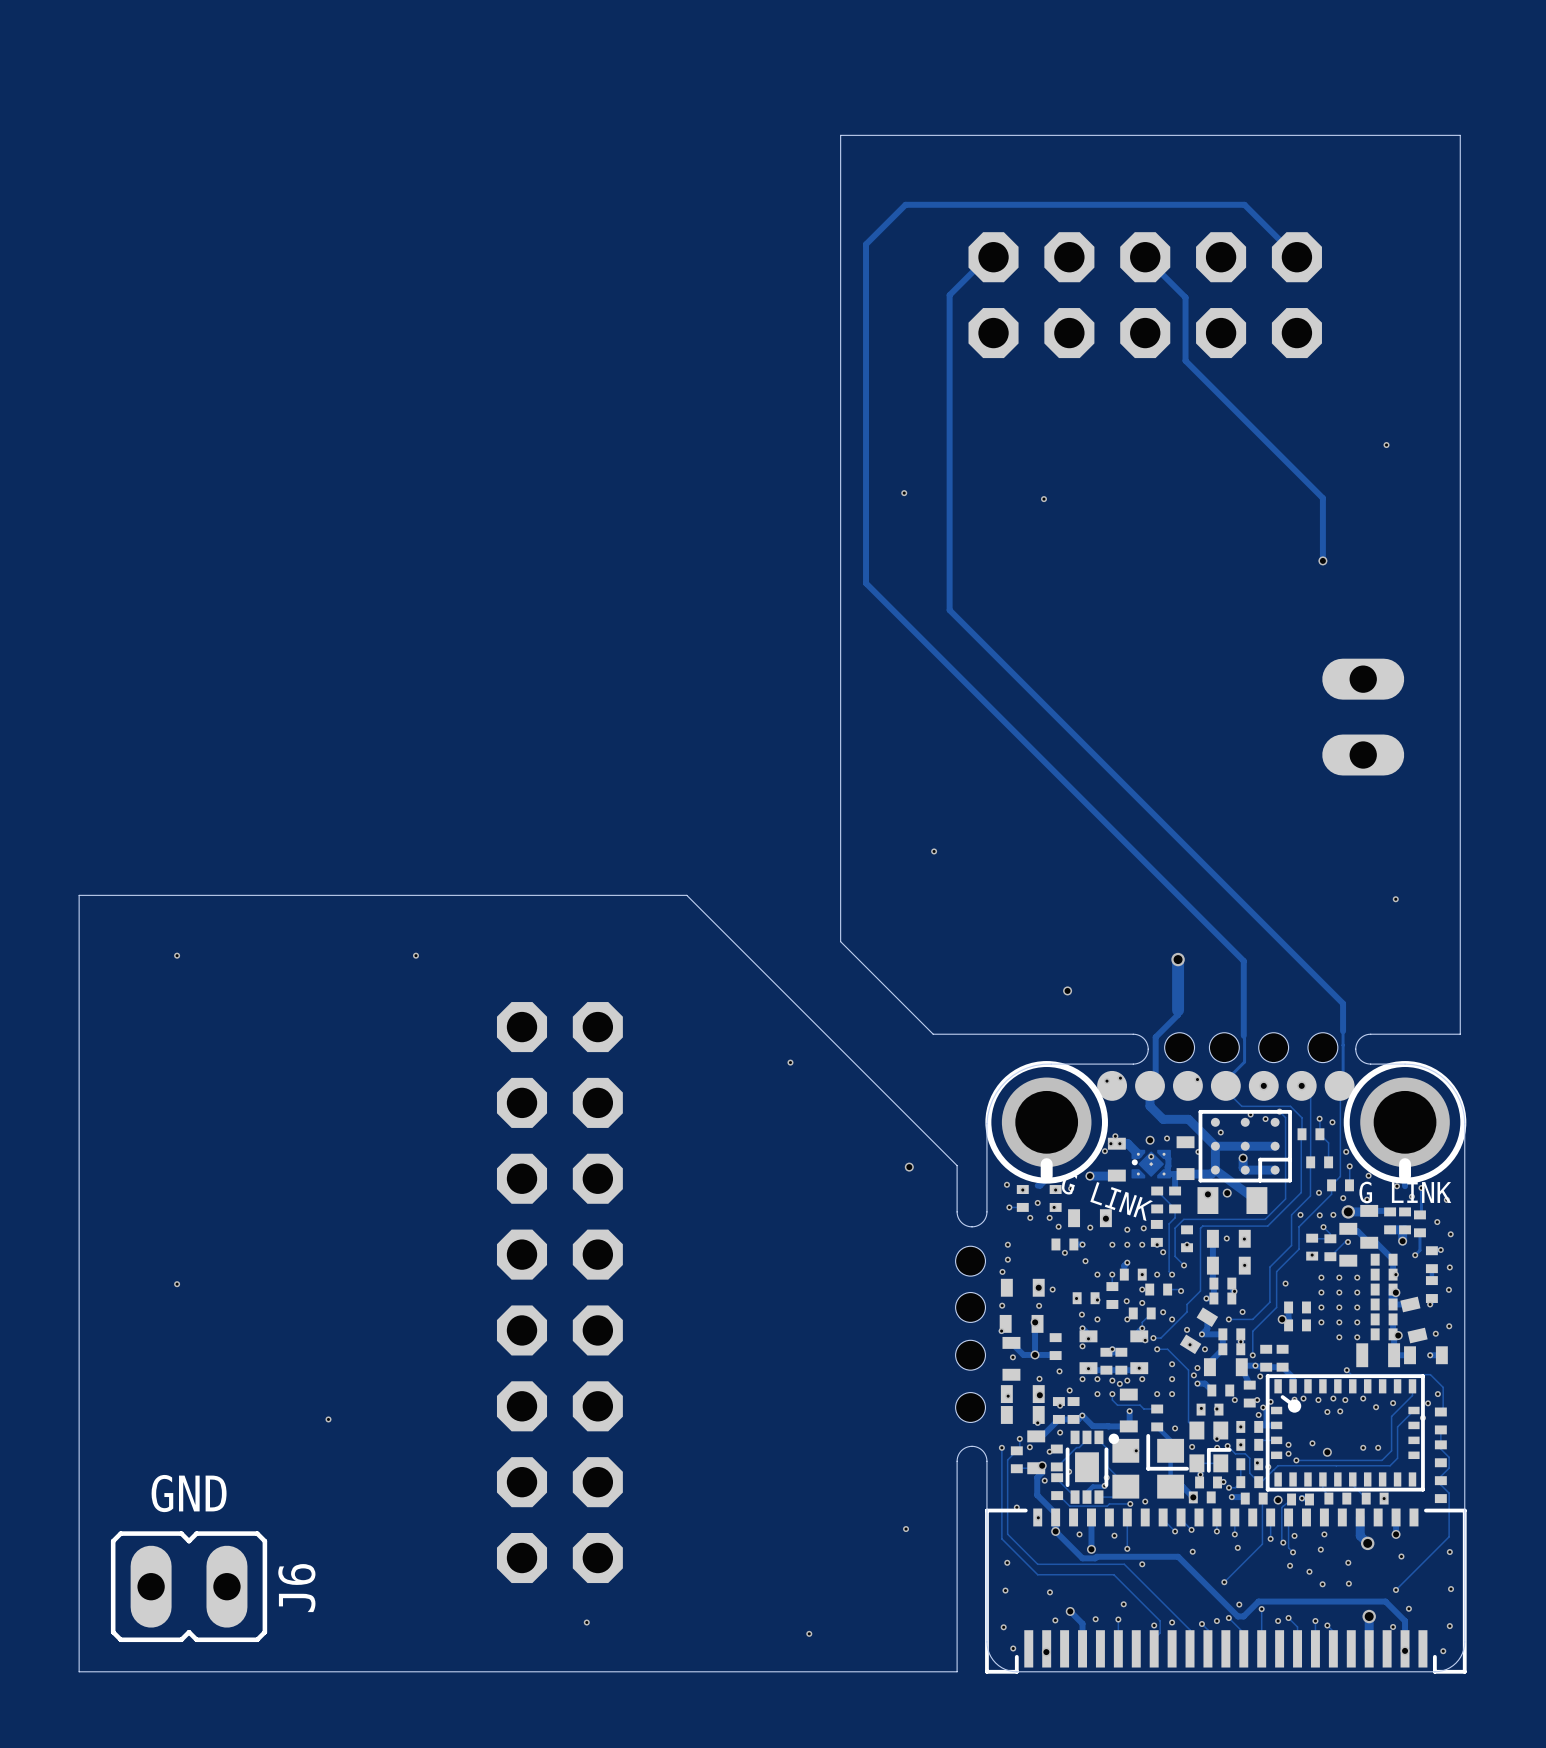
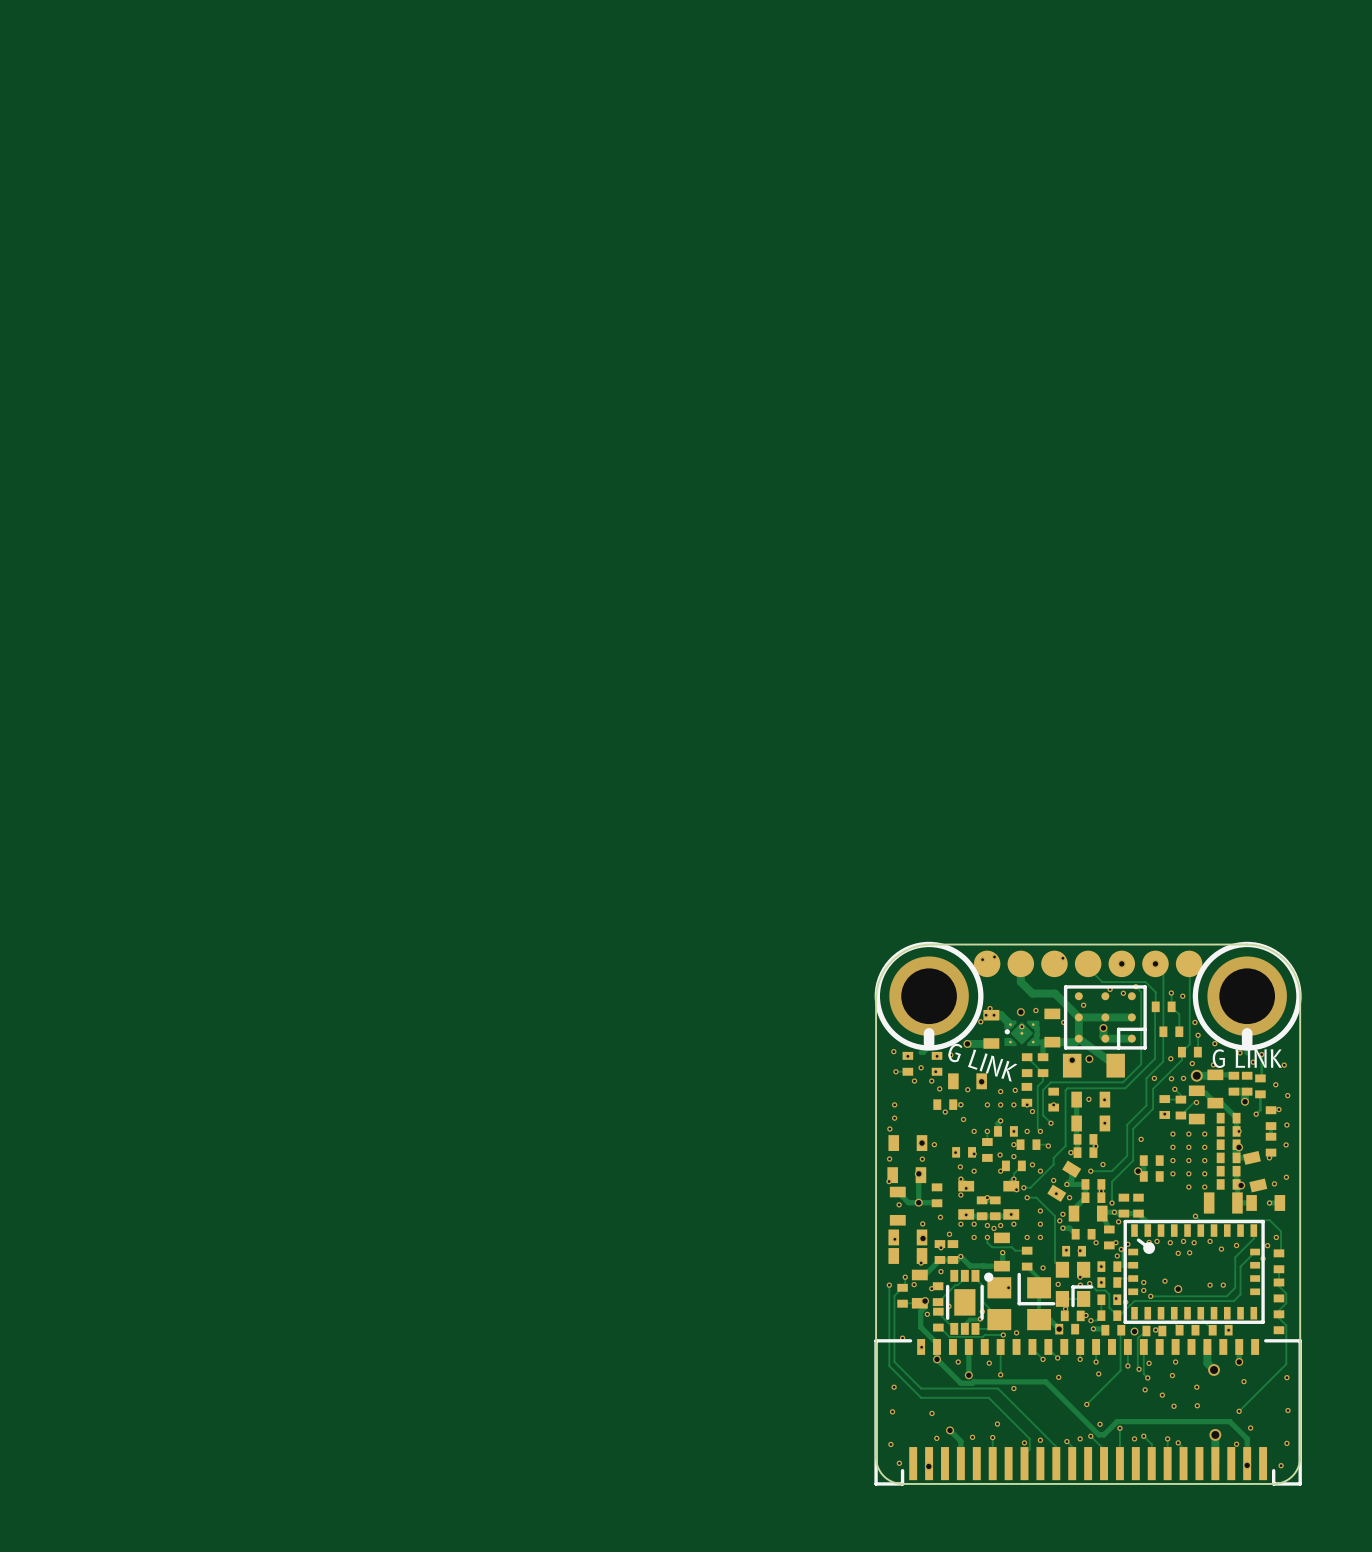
track: (993, 257) (987, 257) (949, 295) (949, 610) (1343, 1003) (1343, 1045) -> none
track: (1145, 257) (1185, 297) (1185, 360) (1322, 498) (1322, 560) -> none
track: (1296, 257) (1244, 204) (905, 204) (866, 244) (866, 583) (1243, 961) (1244, 1062) (1225, 1080) -> none
part: (1145, 295) -> none
via: (1386, 445) -> none
via: (904, 493) -> none
via: (1043, 499) -> none
via: (1322, 560) -> none
part: (1363, 717) -> none
via: (934, 851) -> none
via: (1395, 899) -> none
via: (177, 955) -> none
via: (415, 955) -> none
track: (1178, 958) (1178, 1014) (1155, 1037) (1155, 1080) -> none
via: (1178, 959) -> none
via: (1067, 990) -> none
track: (1343, 1045) (1343, 1082) -> none
hole: (1179, 1047) -> none
hole: (1224, 1047) -> none
hole: (1273, 1047) -> none
hole: (1322, 1047) -> none
via: (790, 1062) -> none
board edge: (1370, 1064) (1360, 1059) (1355, 1051) (1358, 1040) (1366, 1034) (1460, 1034) (1460, 135) (840, 135) (840, 941) (933, 1034) (1135, 1034) (1143, 1038) (1148, 1049) (1143, 1059) (1133, 1064) -> (1216, 944) (1005, 944)
via: (909, 1167) -> none
board edge: (986, 1211) (983, 1221) (977, 1225) (968, 1226) (961, 1222) (957, 1213) (957, 1165) (686, 895) (79, 895) (79, 1671) (957, 1671) (957, 1459) (961, 1450) (972, 1446) (982, 1450) (986, 1461) -> (876, 1075) (876, 1297)
hole: (970, 1261) -> none
via: (177, 1284) -> none
part: (559, 1292) -> none
hole: (970, 1307) -> none
hole: (970, 1355) -> none
hole: (970, 1407) -> none
via: (328, 1419) -> none
text: GND (189, 1493) -> none
via: (906, 1529) -> none
J6: (189, 1586) -> none
via: (586, 1622) -> none
via: (809, 1633) -> none

